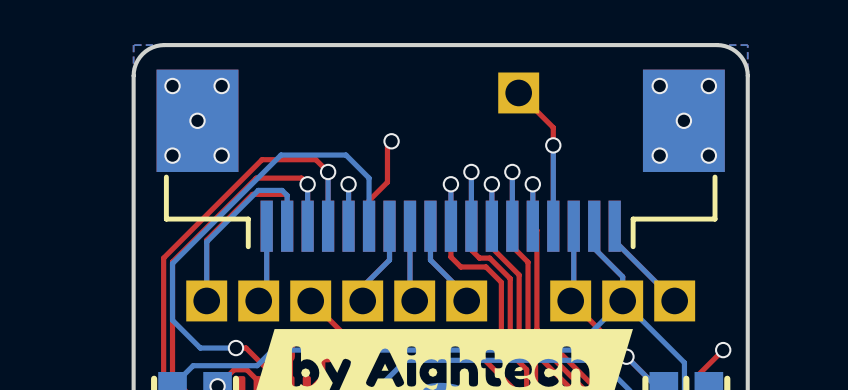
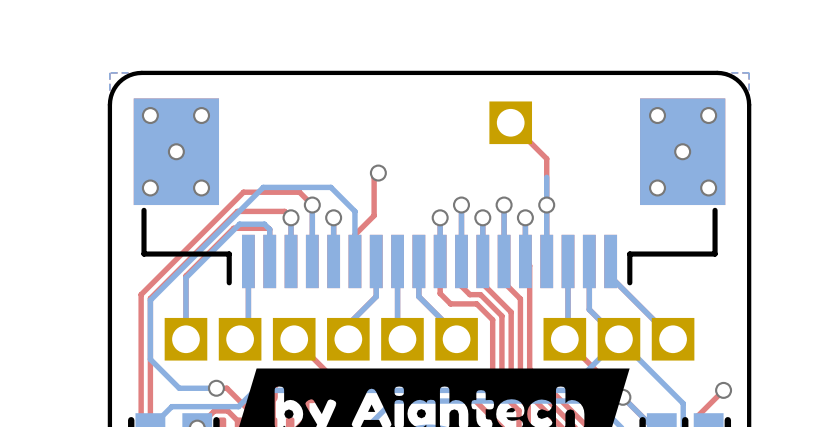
via position: (553, 145) -> (546, 205)
bottom track: (594, 248) (622, 276) (622, 300) -> (589, 284) (589, 309) (618, 339)

